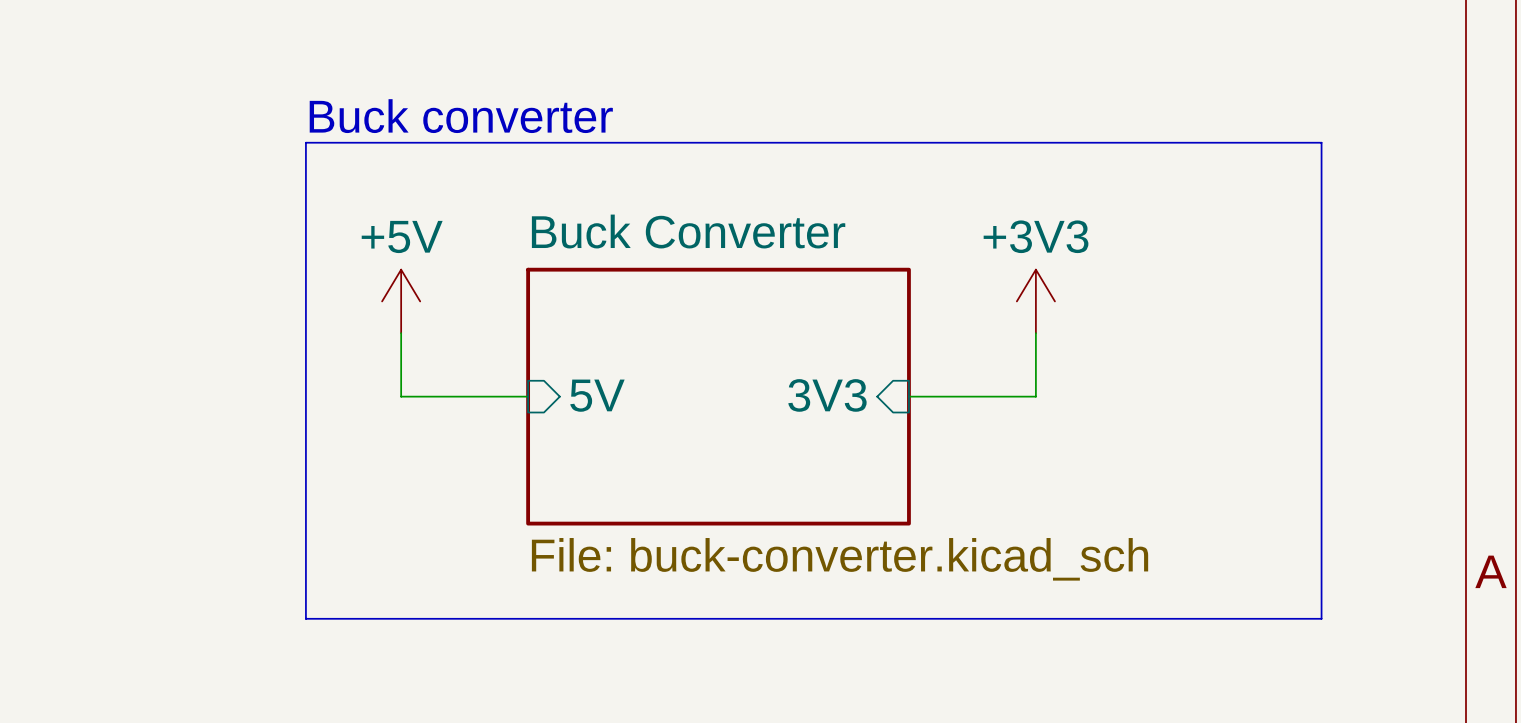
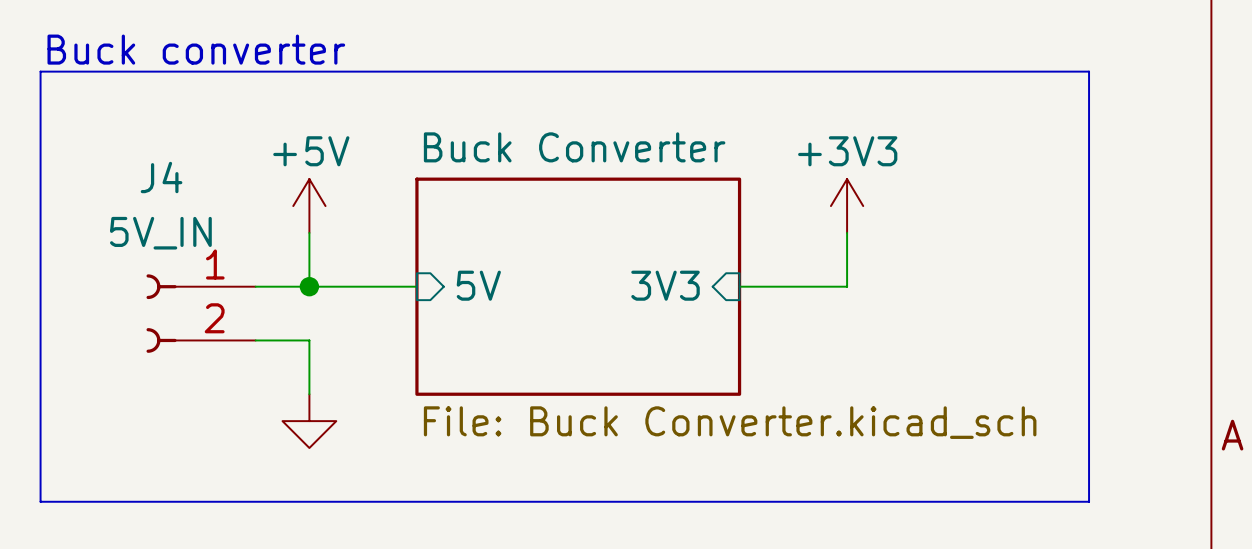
text position: Buck converter (461, 116) -> Buck converter (196, 49)
line: (305, 142) (305, 618) (1321, 618) -> (228, 71) (40, 71) (40, 501) (1089, 501) (1089, 474)
wire: none -> (255, 286) (309, 286)
junction: none -> (309, 286)
J4: none -> 5V_IN (201, 313)
wire: none -> (255, 340) (309, 340) (309, 394)
power symbol: none -> (309, 421)
sheet Buck Converter value: File: buck-converter.kicad_sch (840, 559) -> File: Buck Converter.kicad_sch (730, 422)

